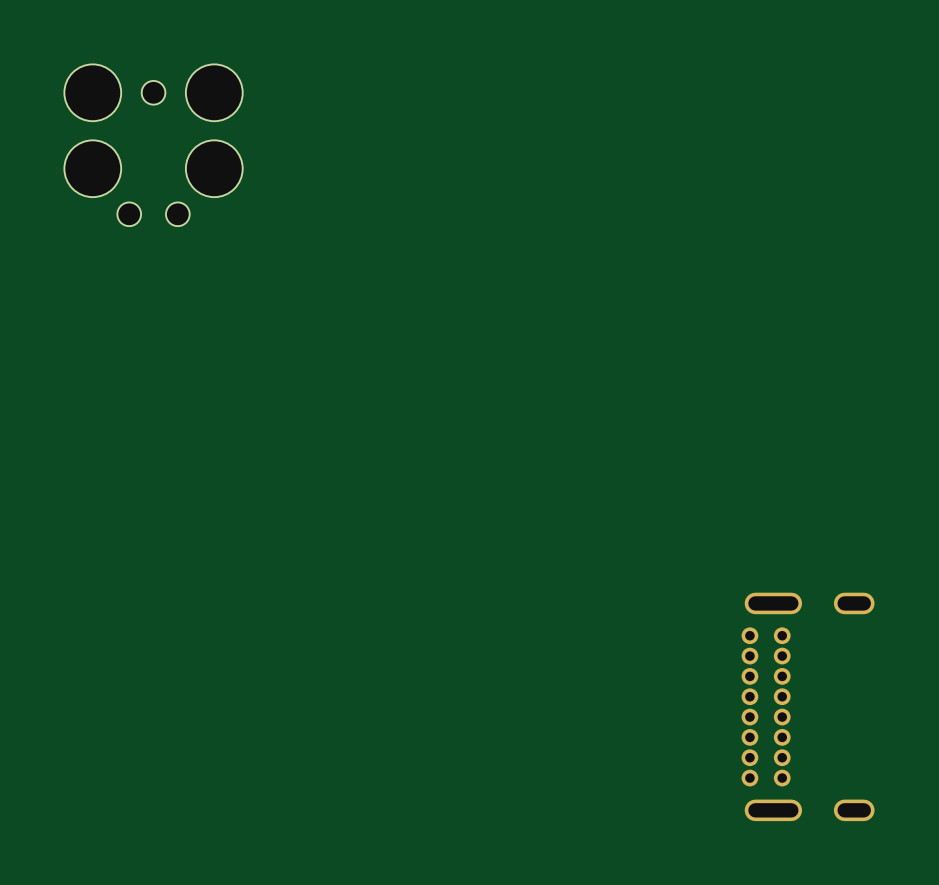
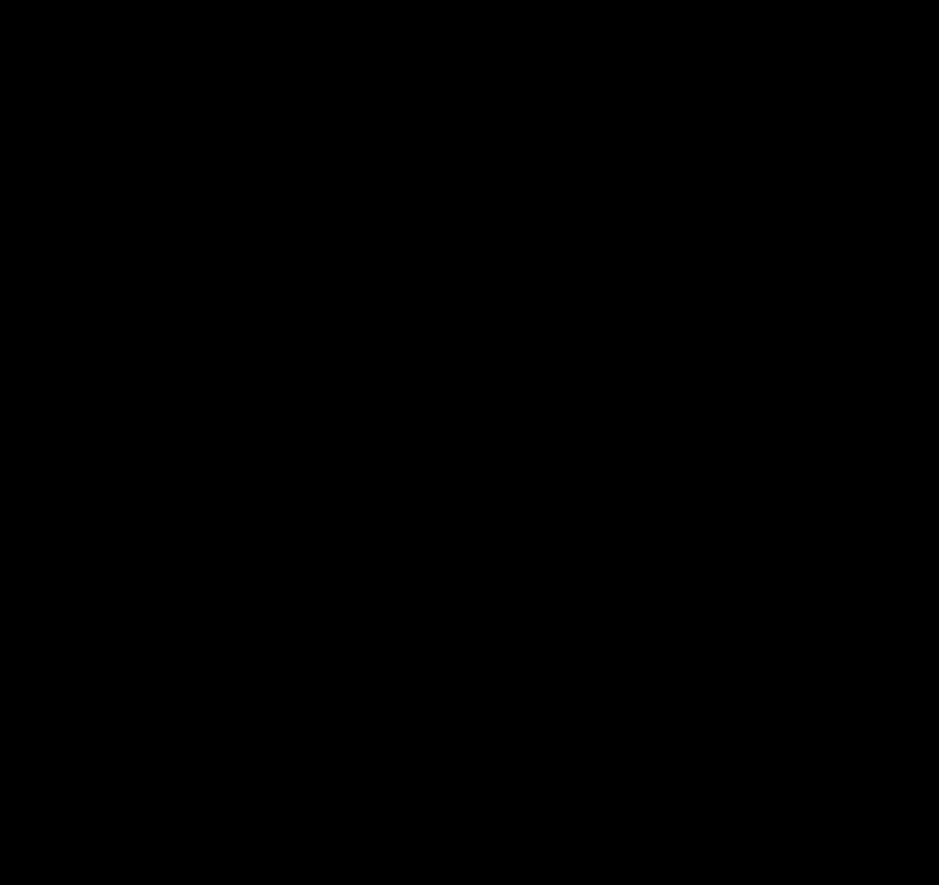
part: (153, 145) -> none
part: (808, 706) -> none

